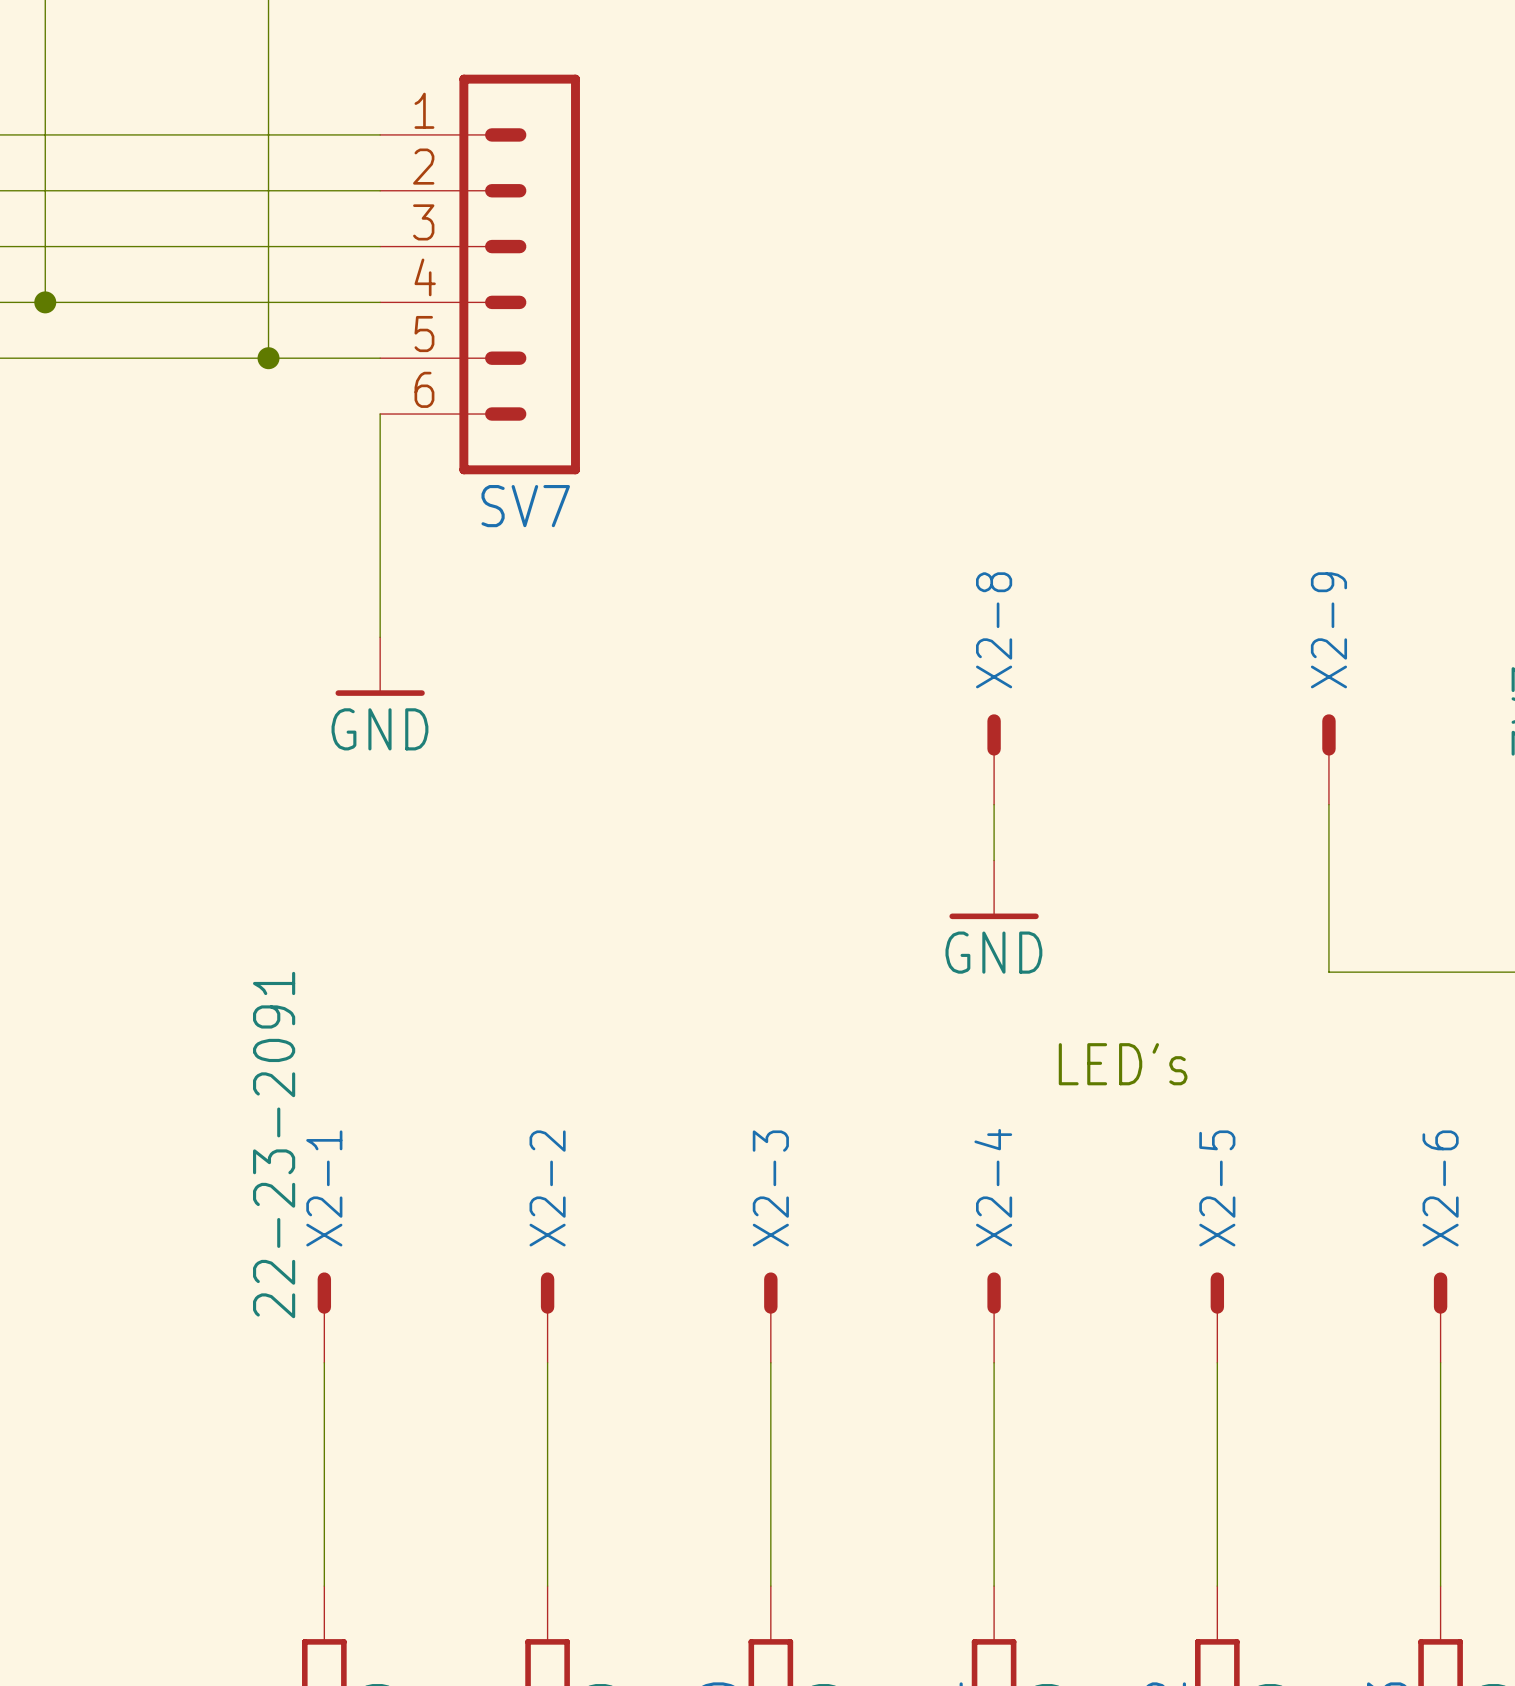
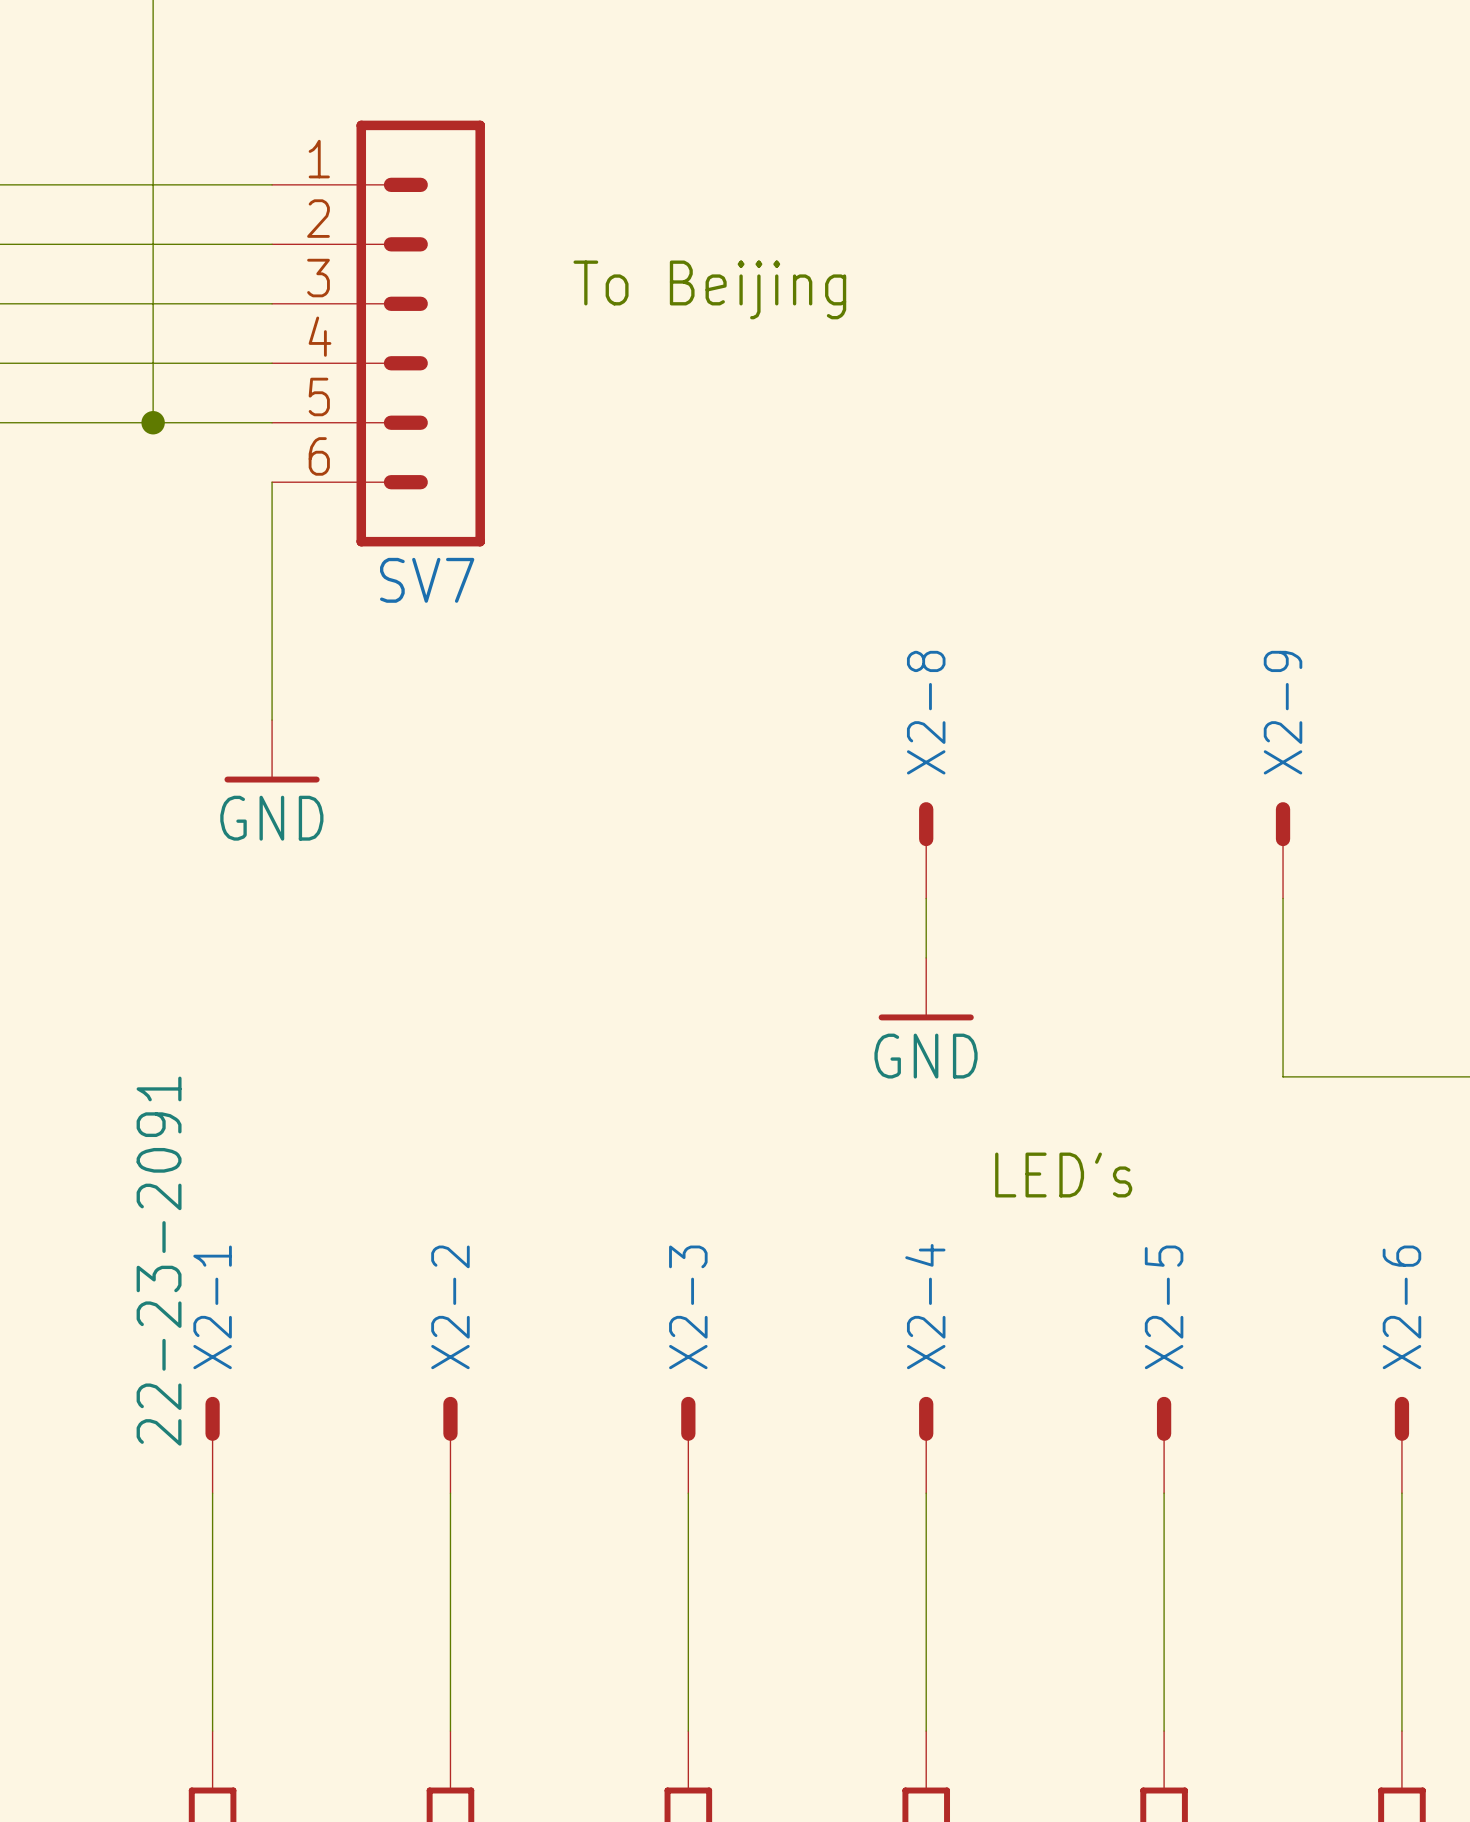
text: none -> To Beijing (709, 289)

